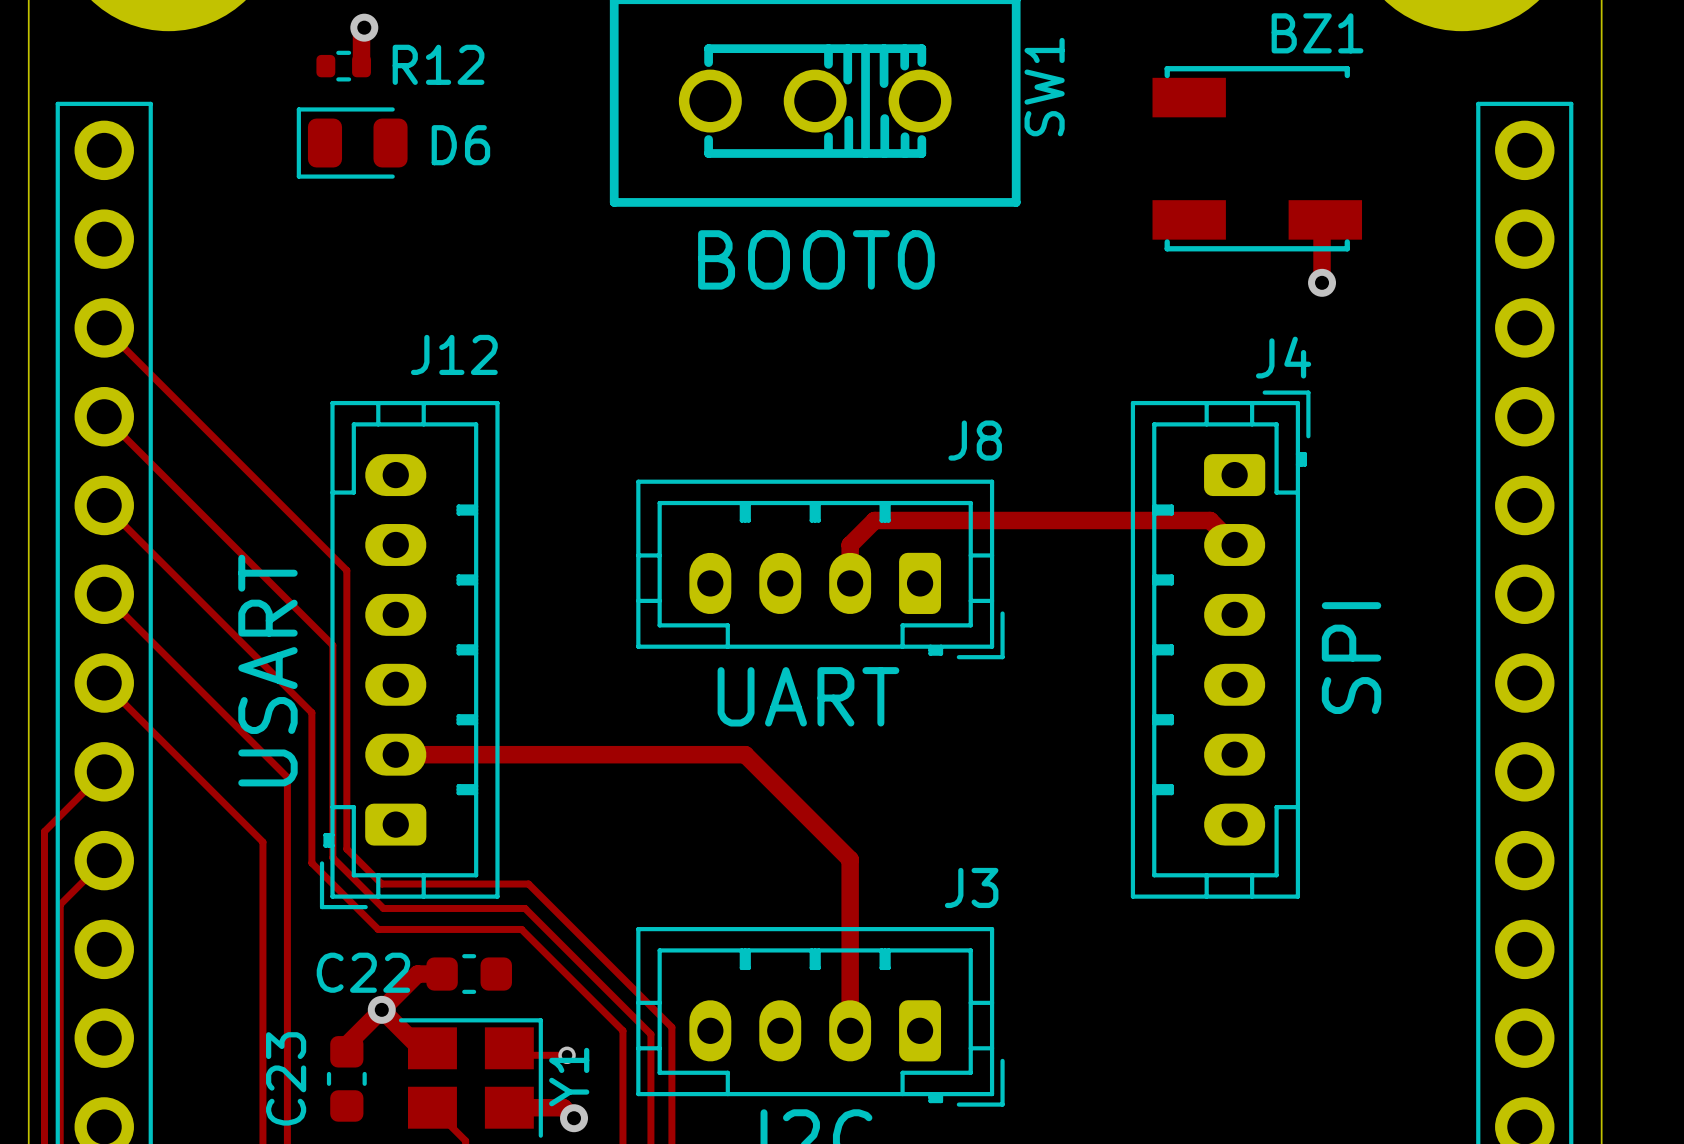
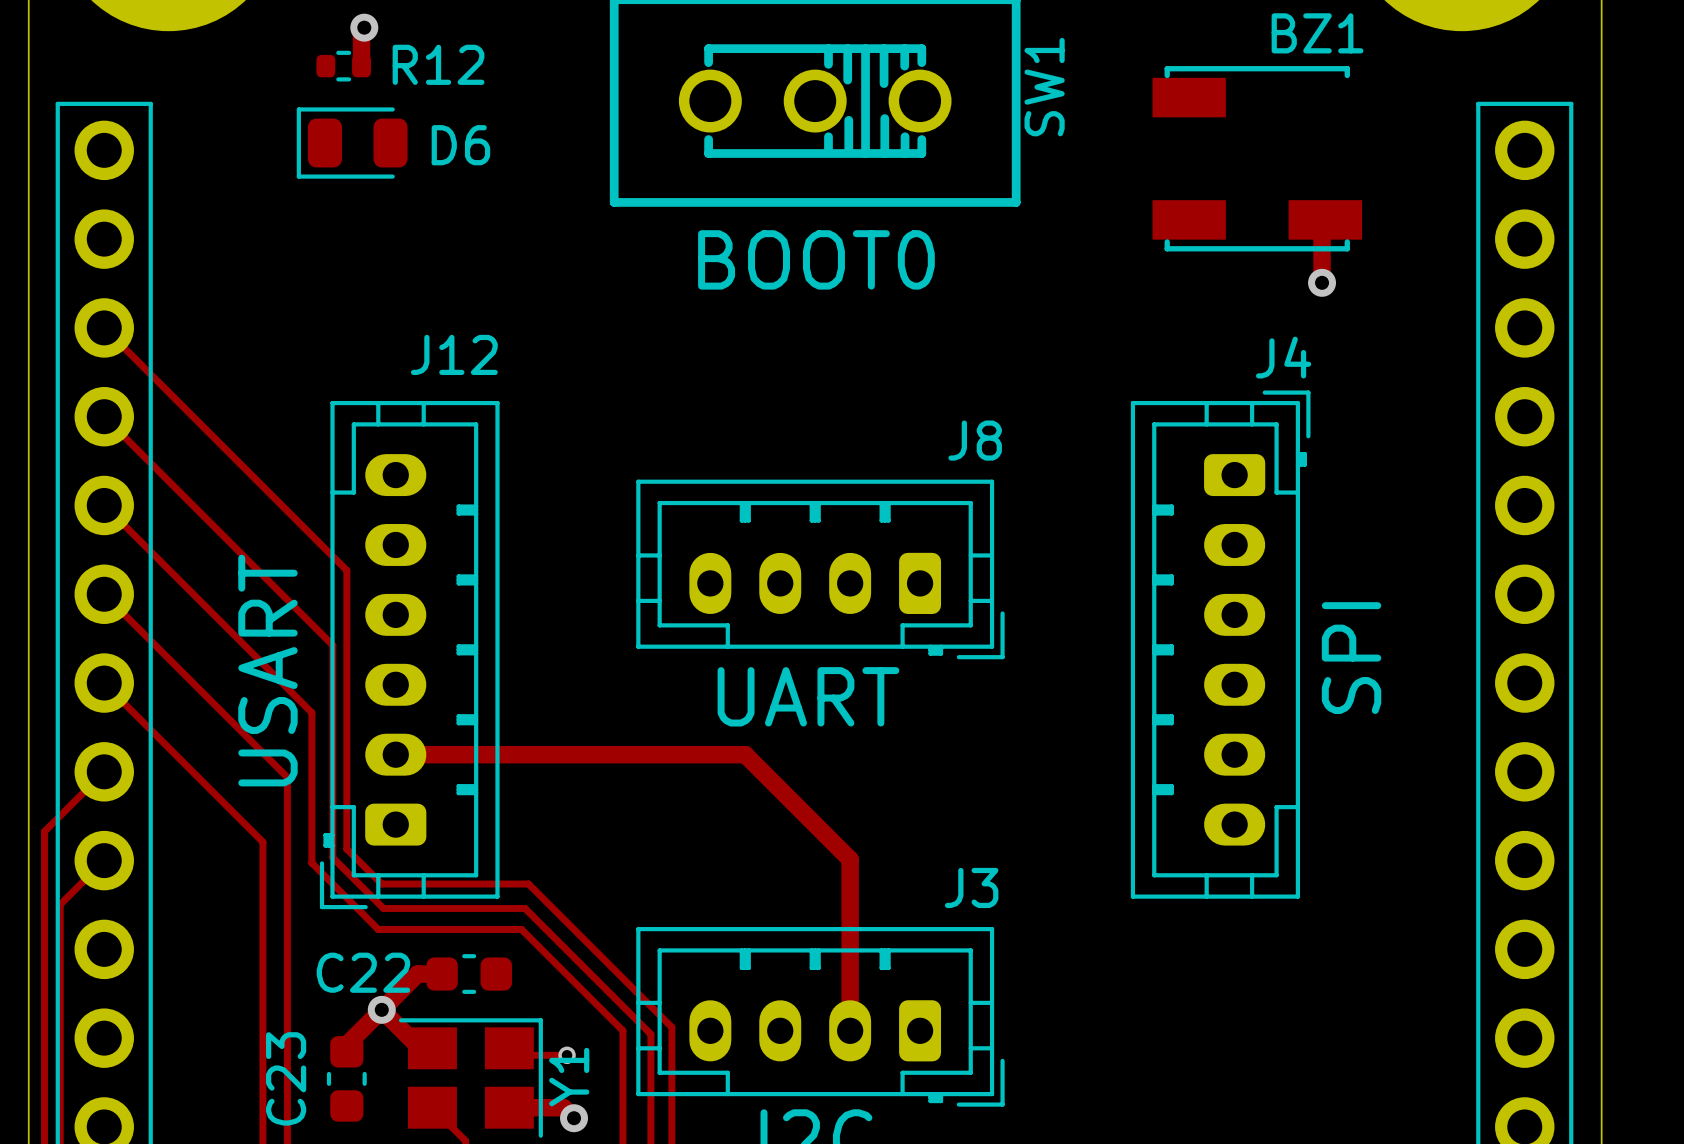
track: (1234, 544) (1210, 520) (874, 520) (850, 544) (850, 583) -> none

